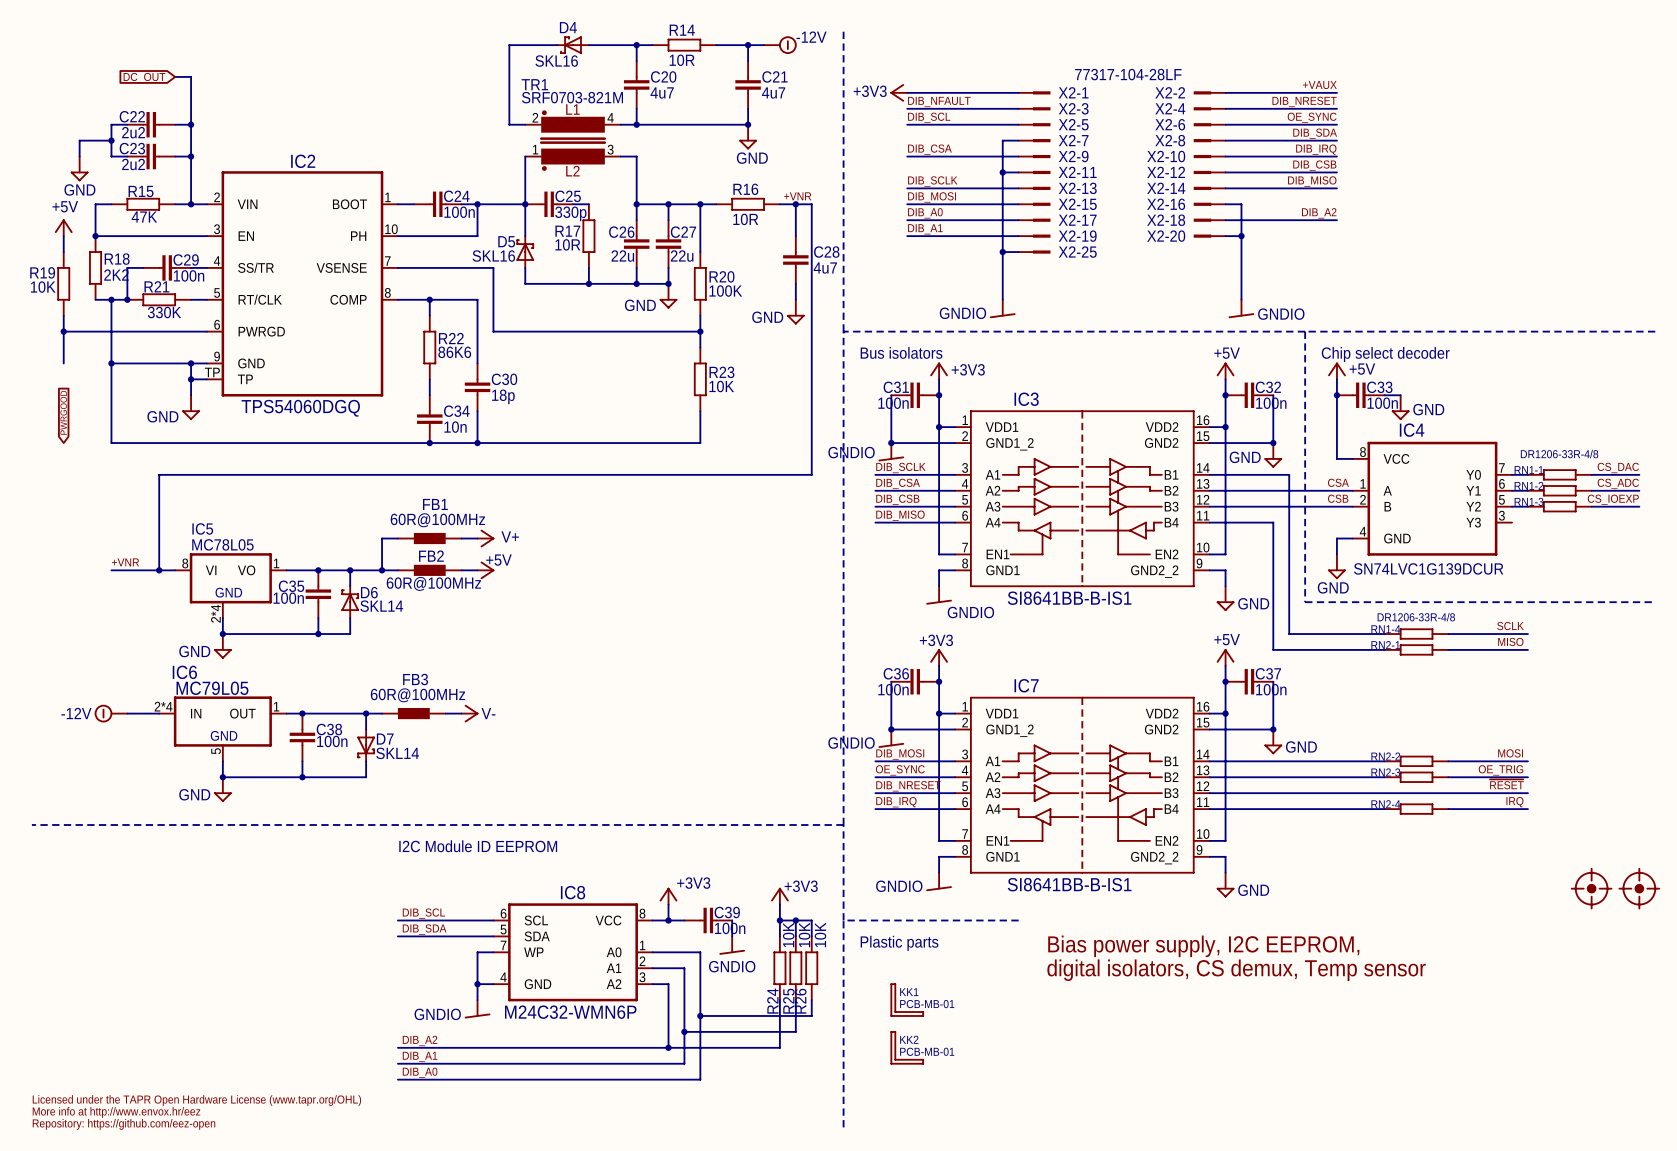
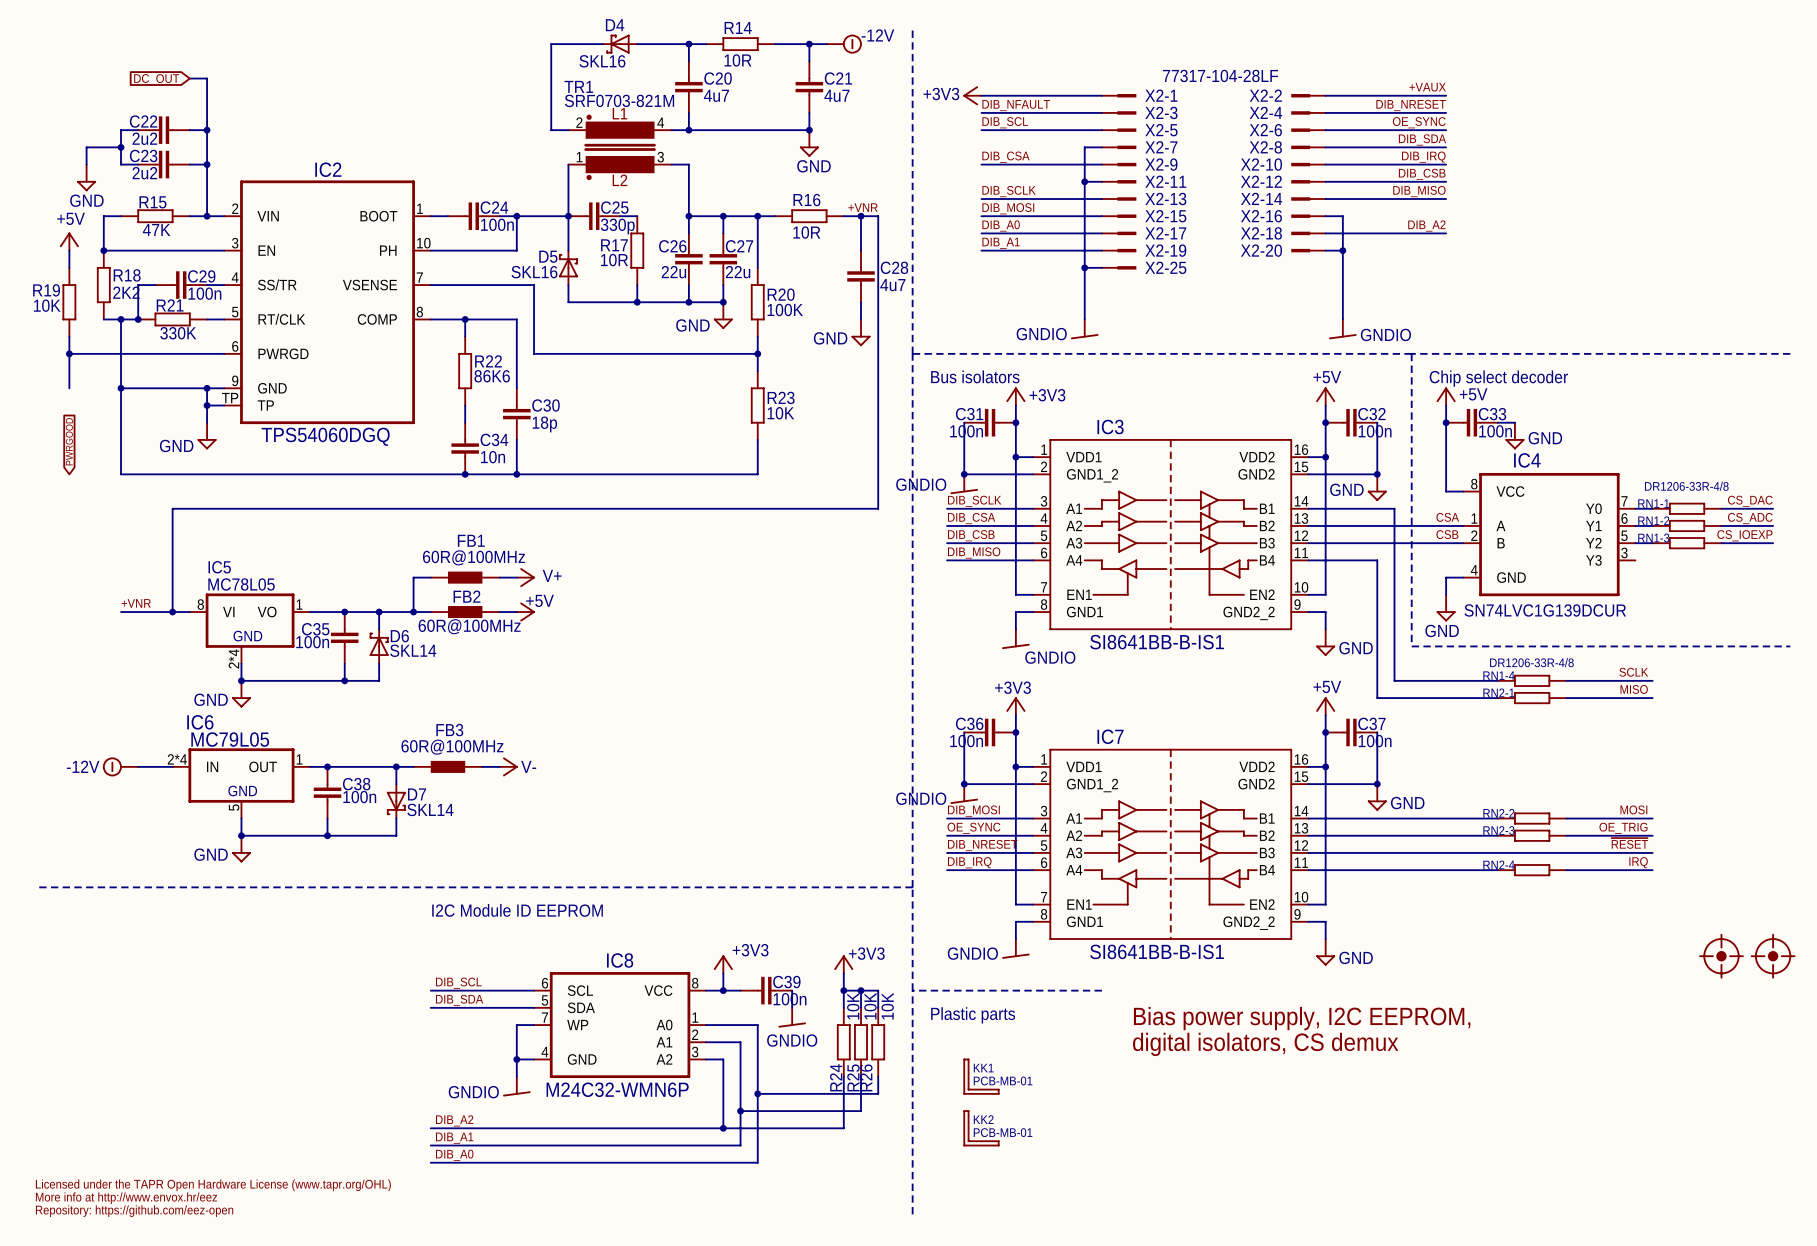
text: digital isolators, CS demux, Temp sensor (1236, 970) -> digital isolators, CS demux (1265, 1044)

